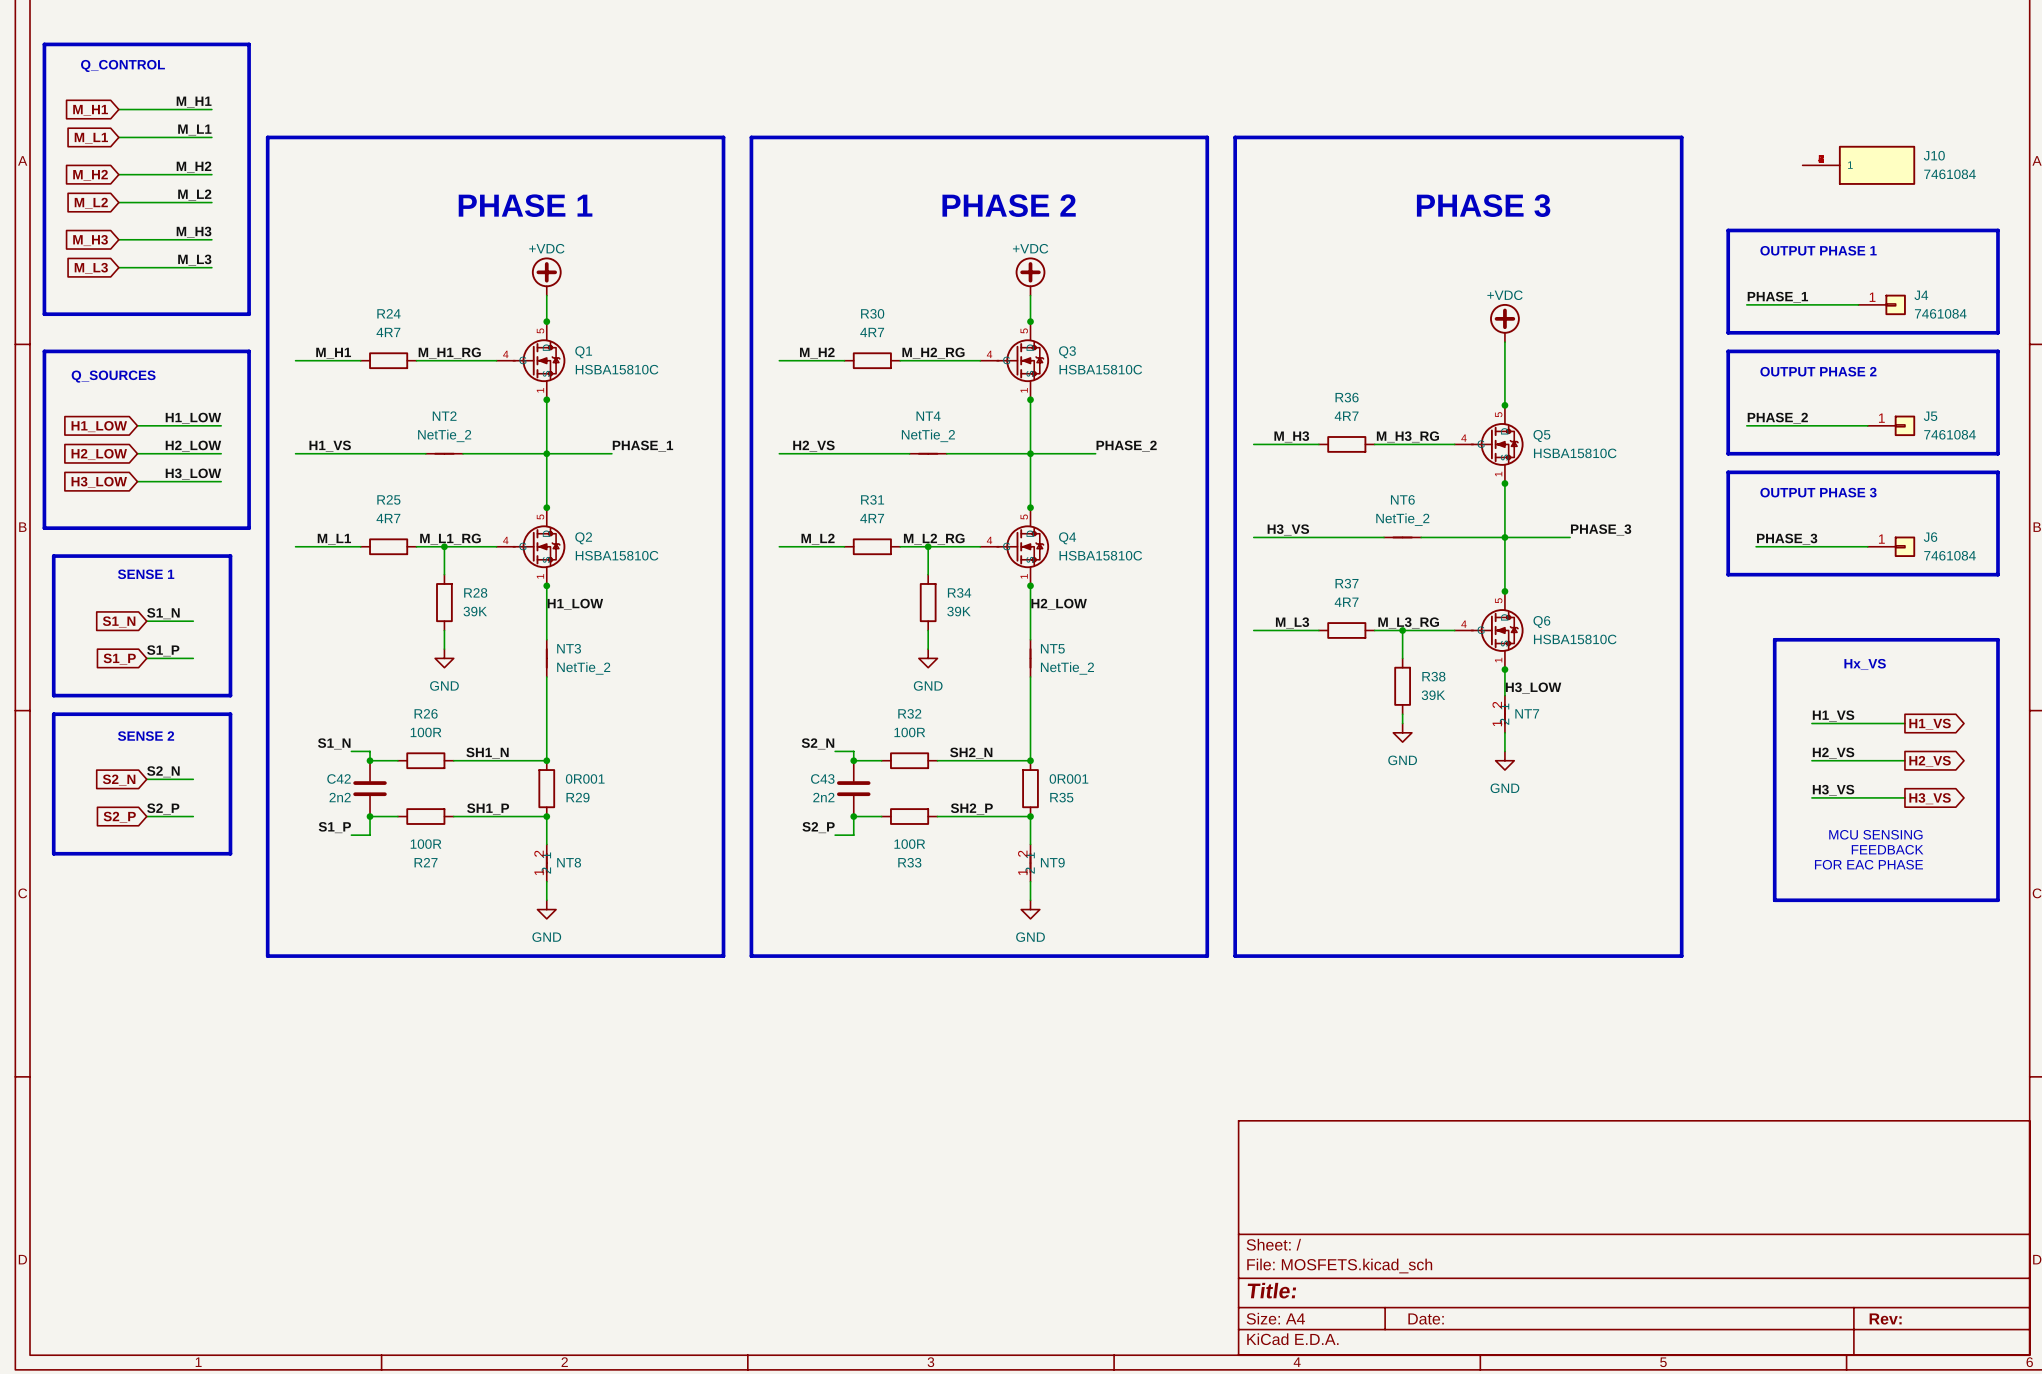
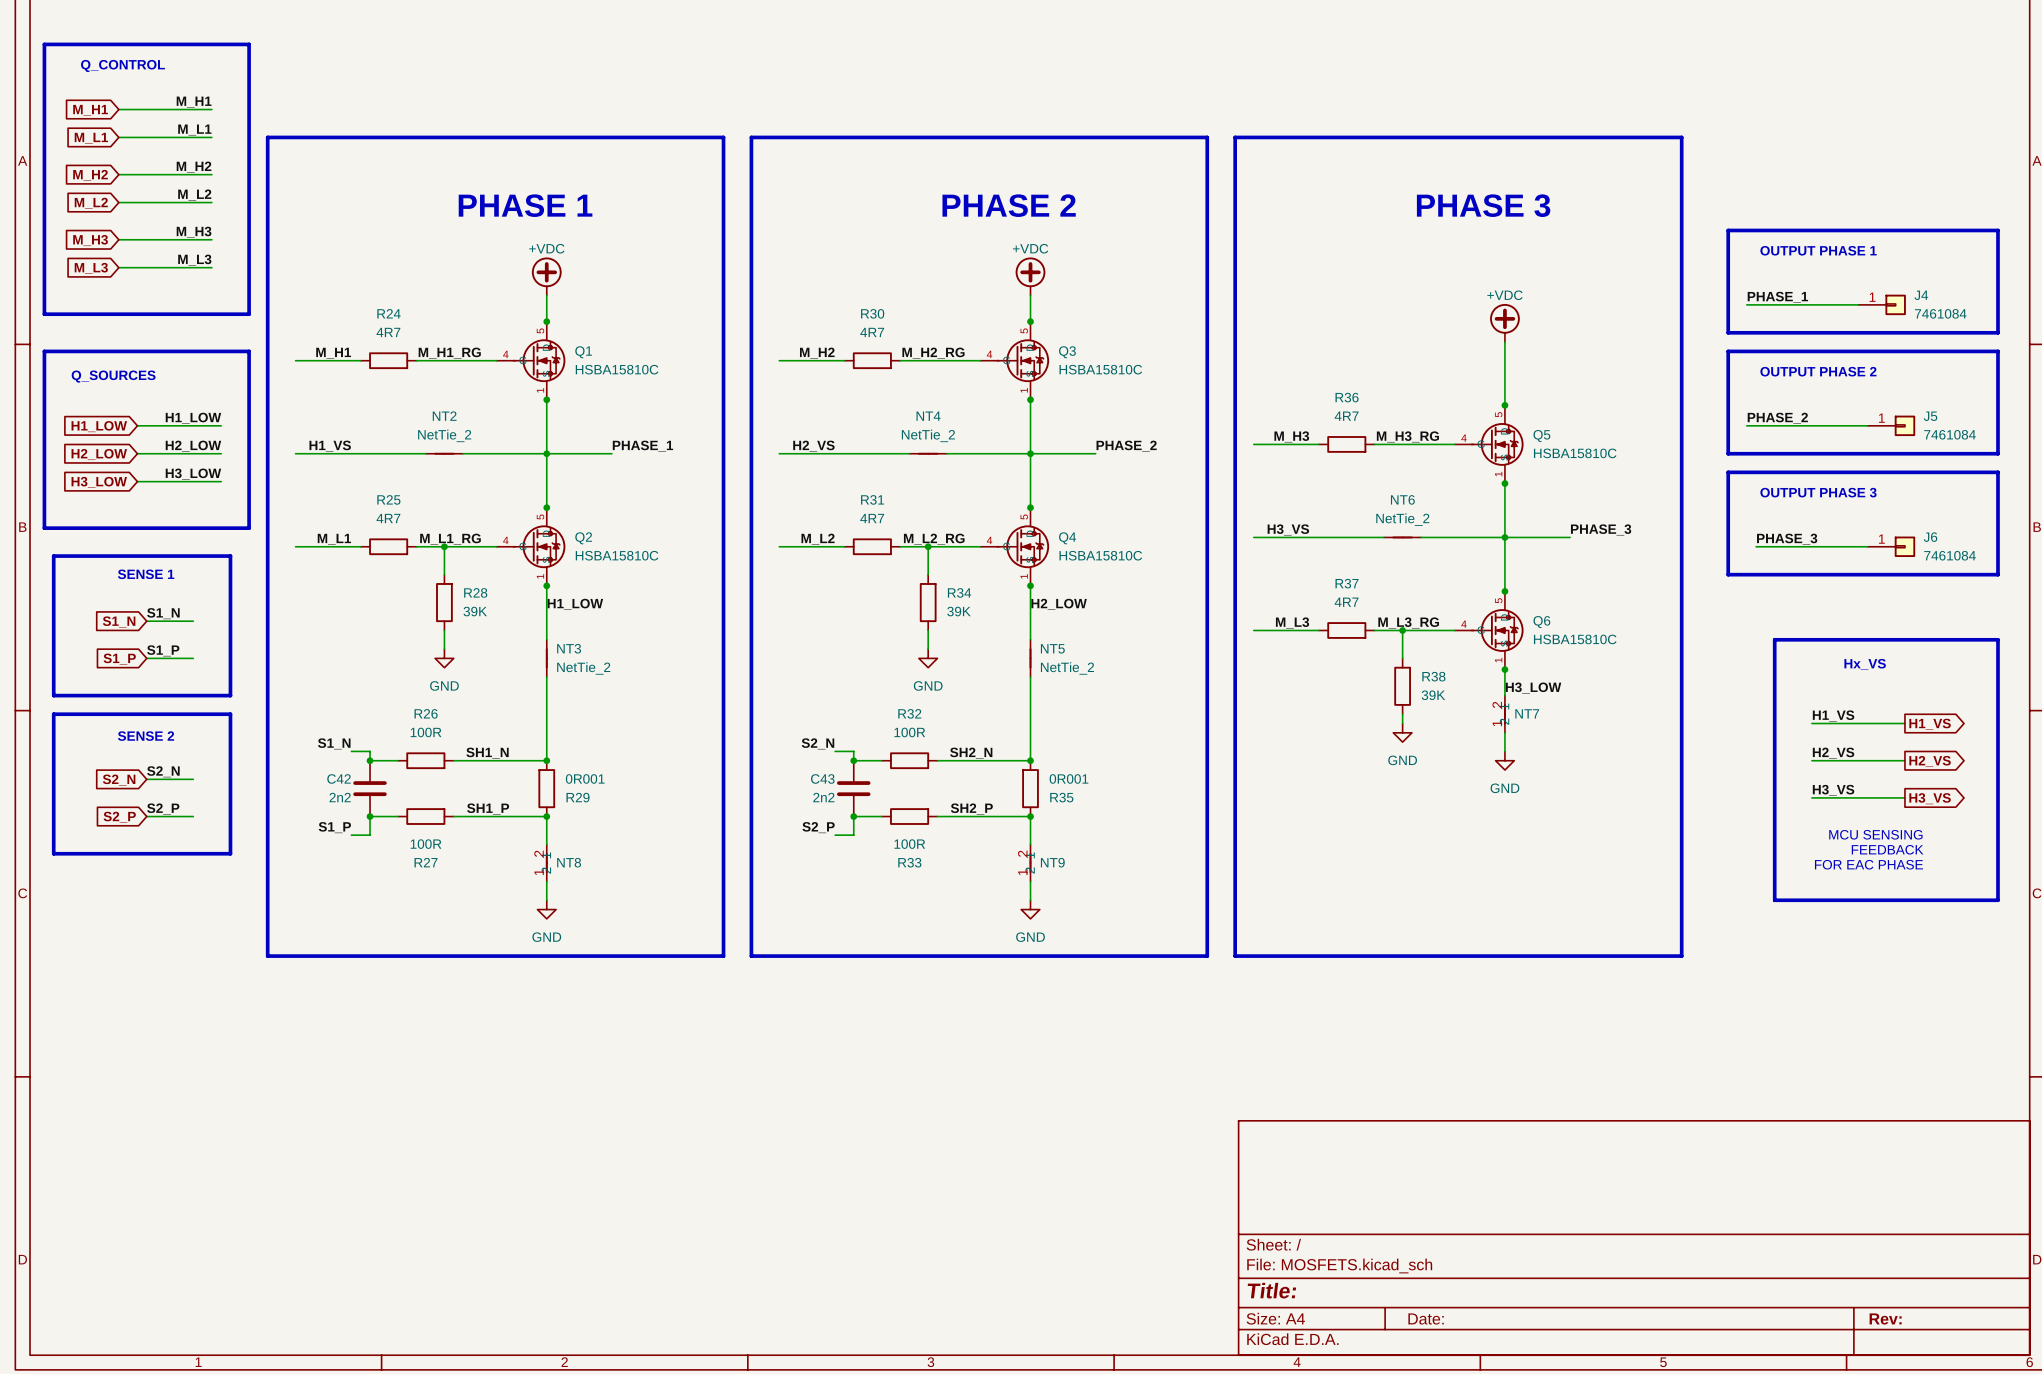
J10: 7461084 (1858, 165) -> none

